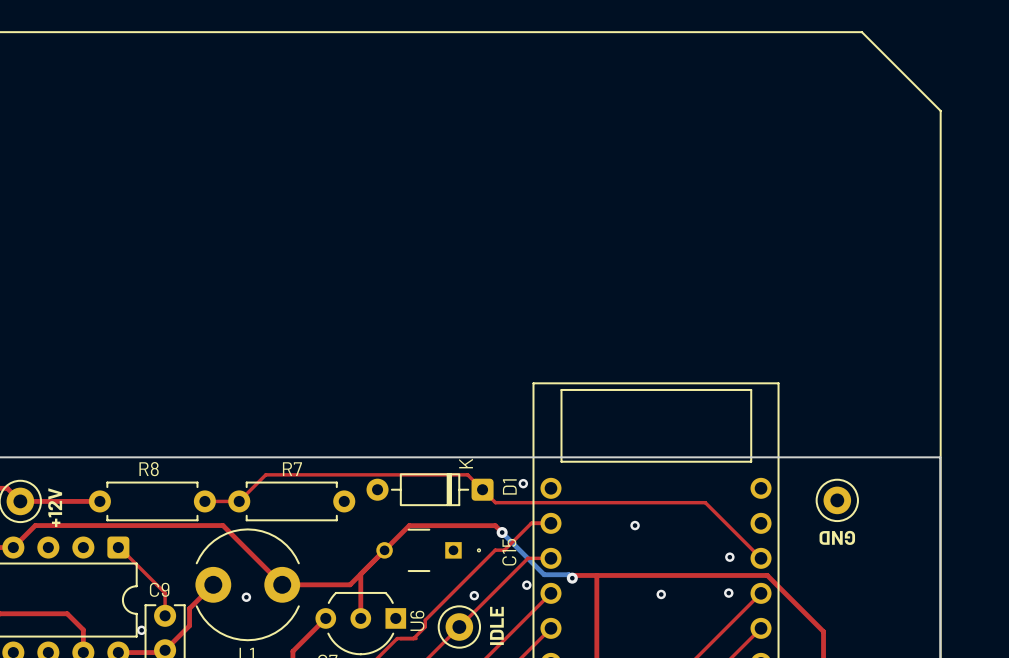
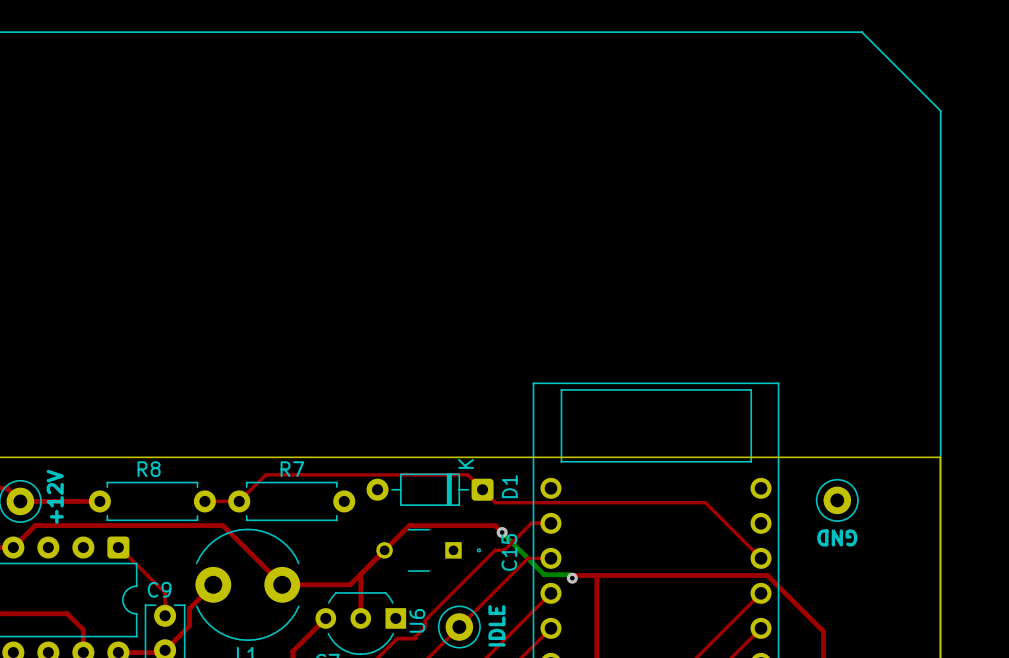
via: (523, 483) -> none
via: (635, 525) -> none
via: (729, 557) -> none
via: (526, 585) -> none
via: (728, 593) -> none
via: (661, 594) -> none
via: (474, 595) -> none
via: (246, 597) -> none
via: (141, 630) -> none

